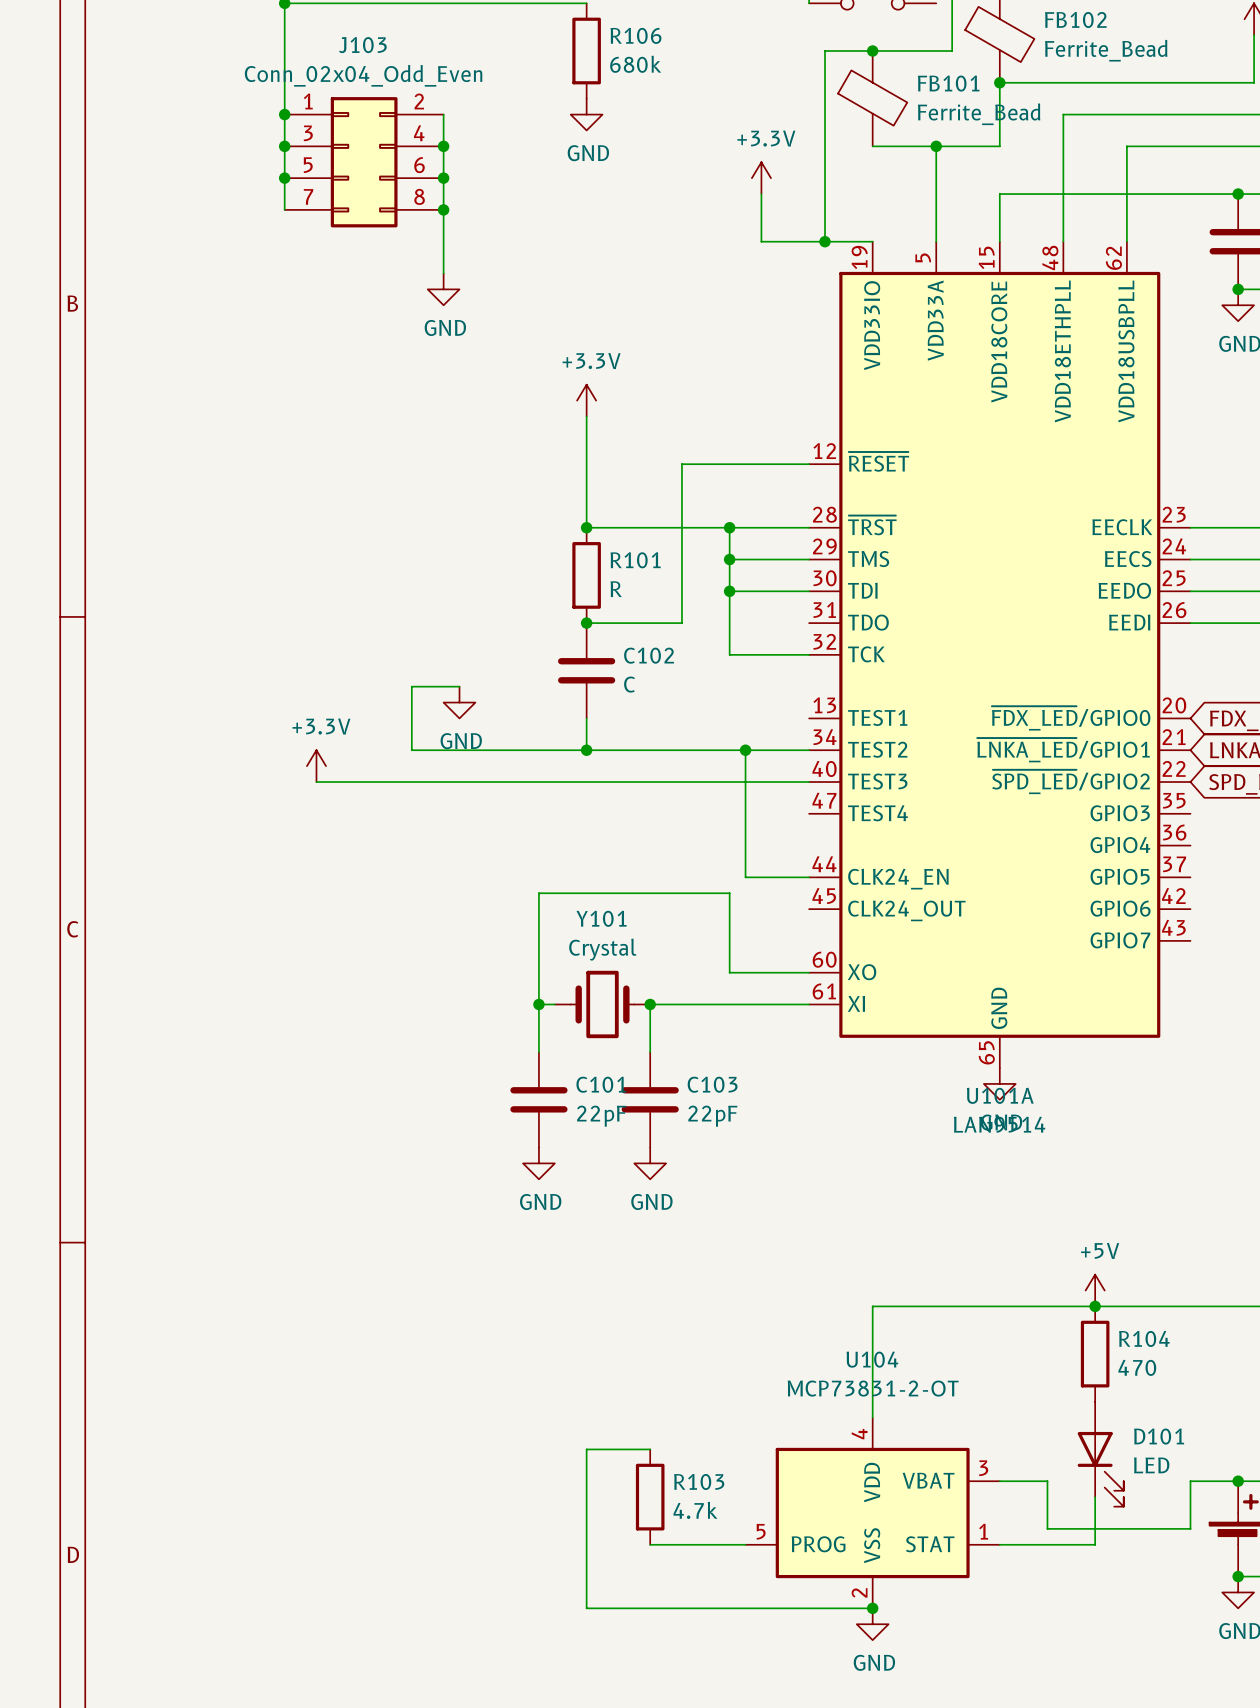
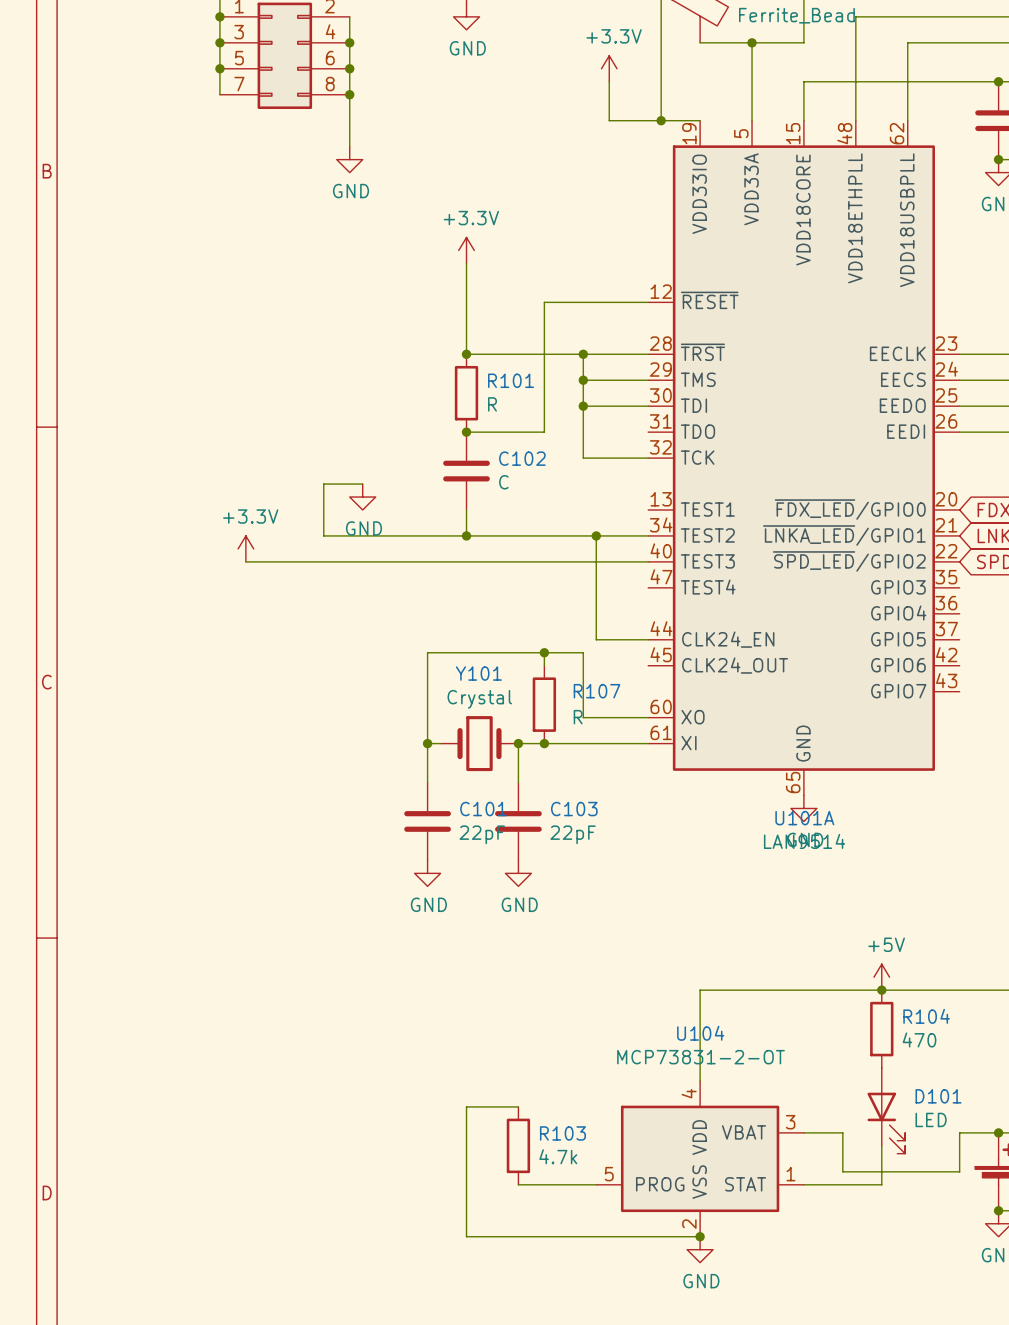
wire: none -> (544, 652) (544, 665)
junction: none -> (544, 652)
R107: none -> R (544, 704)
junction: none -> (544, 743)

